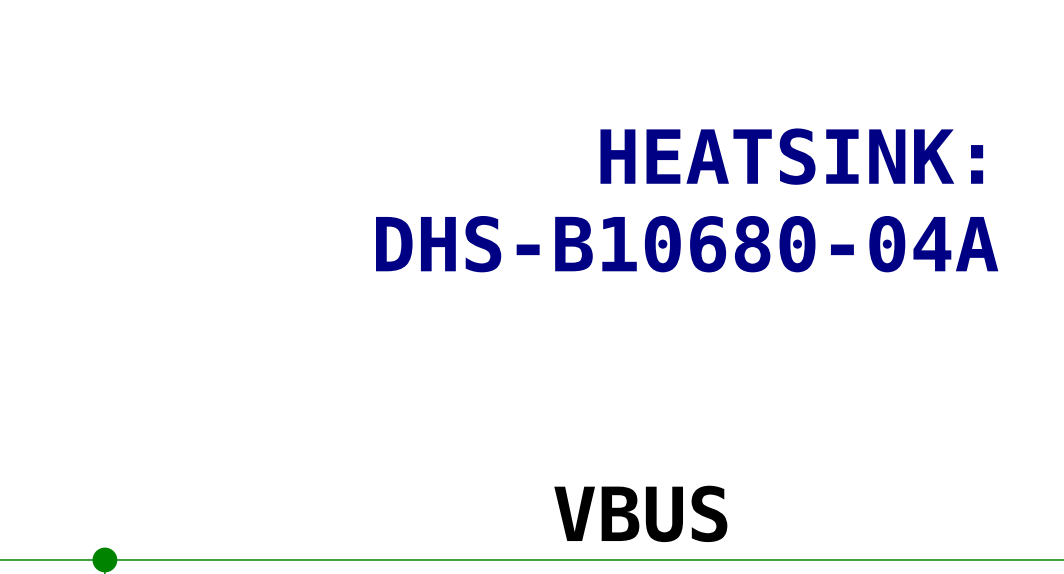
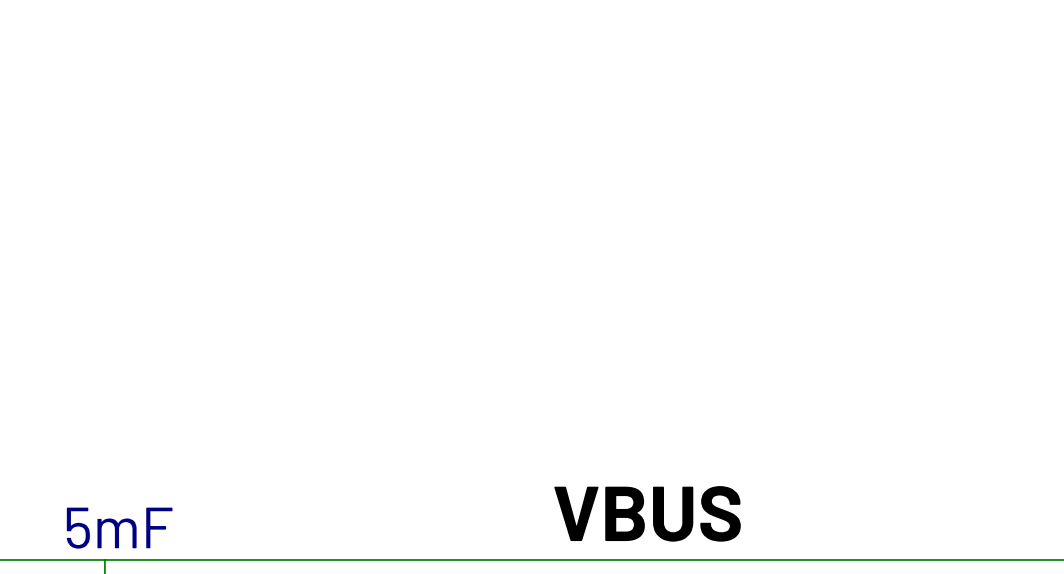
text: HEATSINK: (791, 156) -> none
text: DHS-B10680-04A (687, 244) -> none
text: none -> 5mF (119, 528)
junction: (104, 559) -> none

